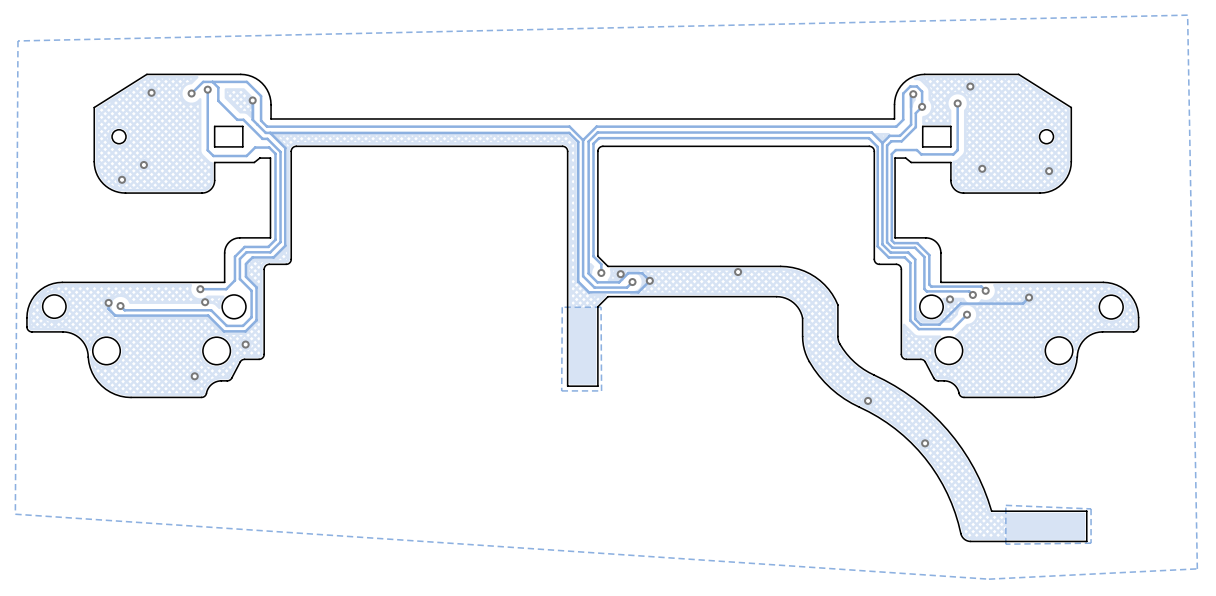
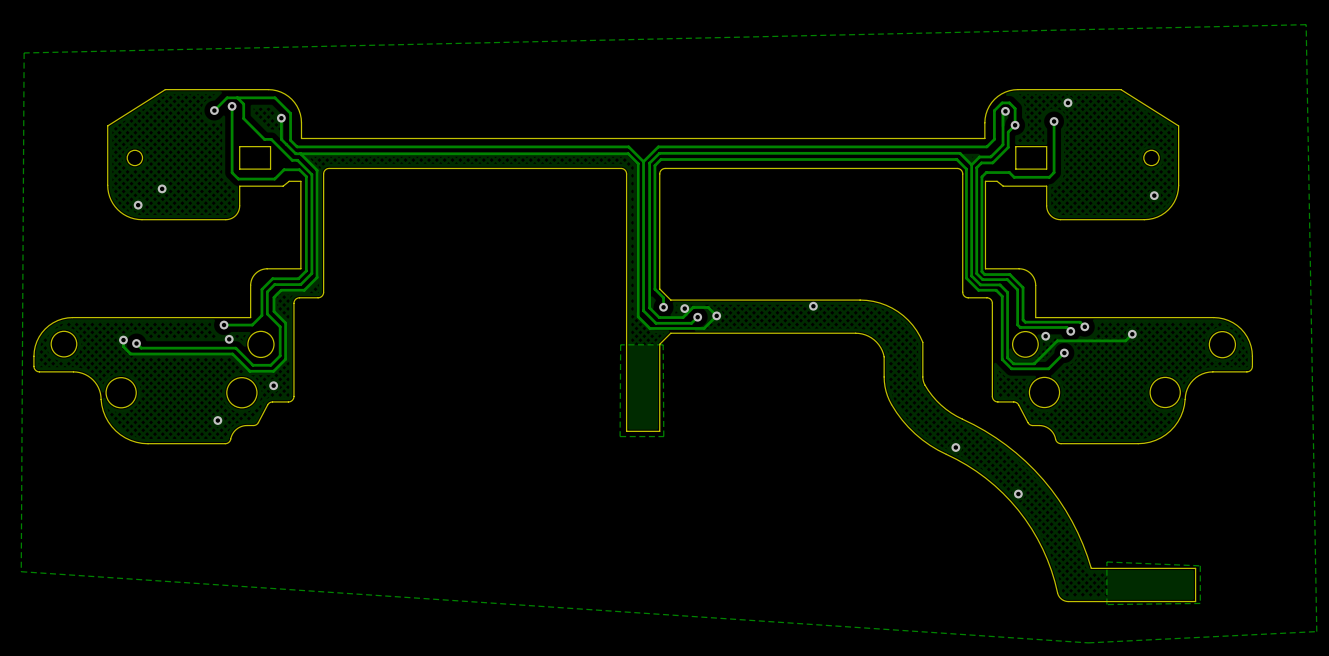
via: (151, 92) -> none
via: (982, 168) -> none

